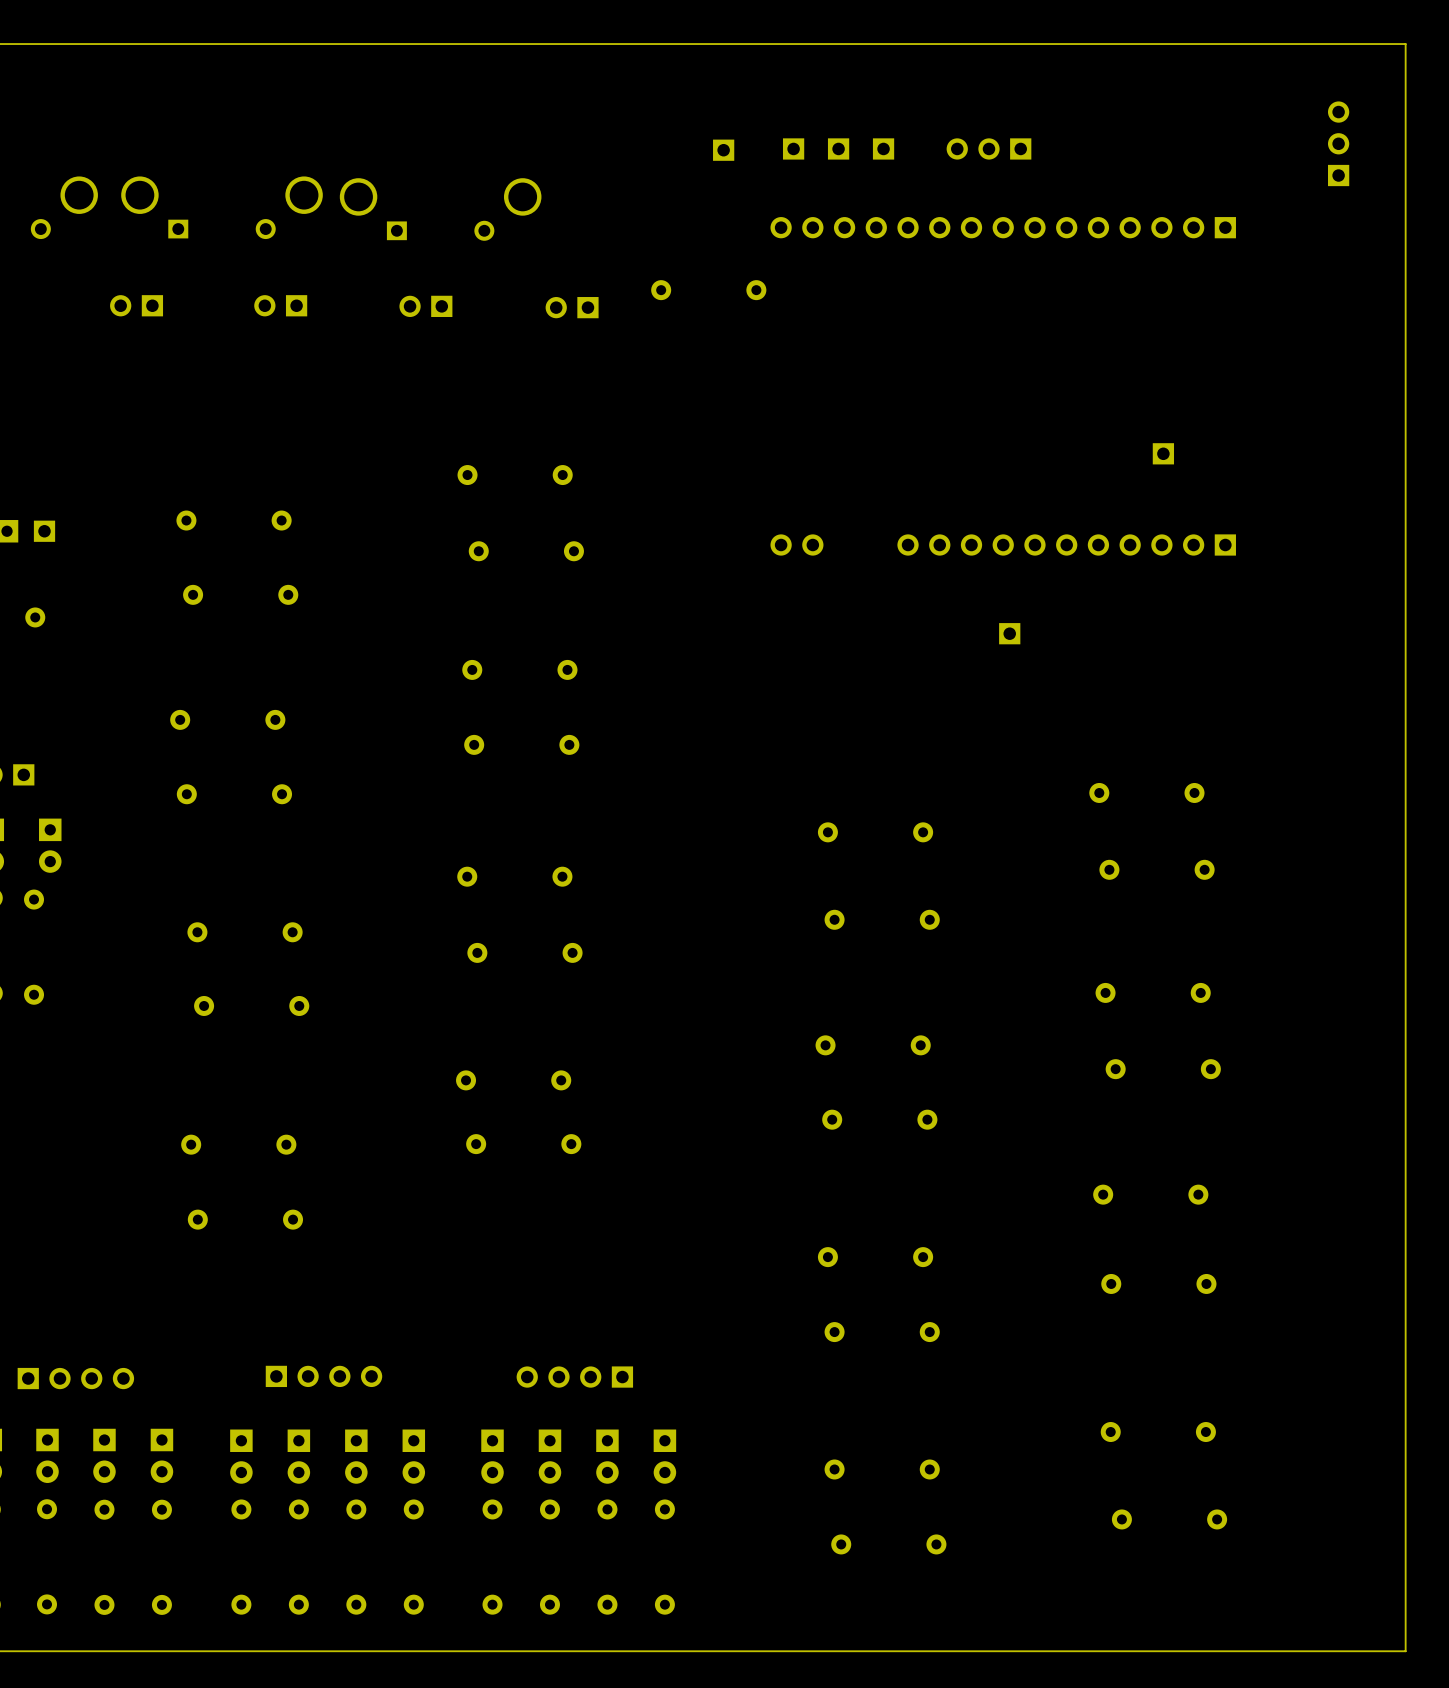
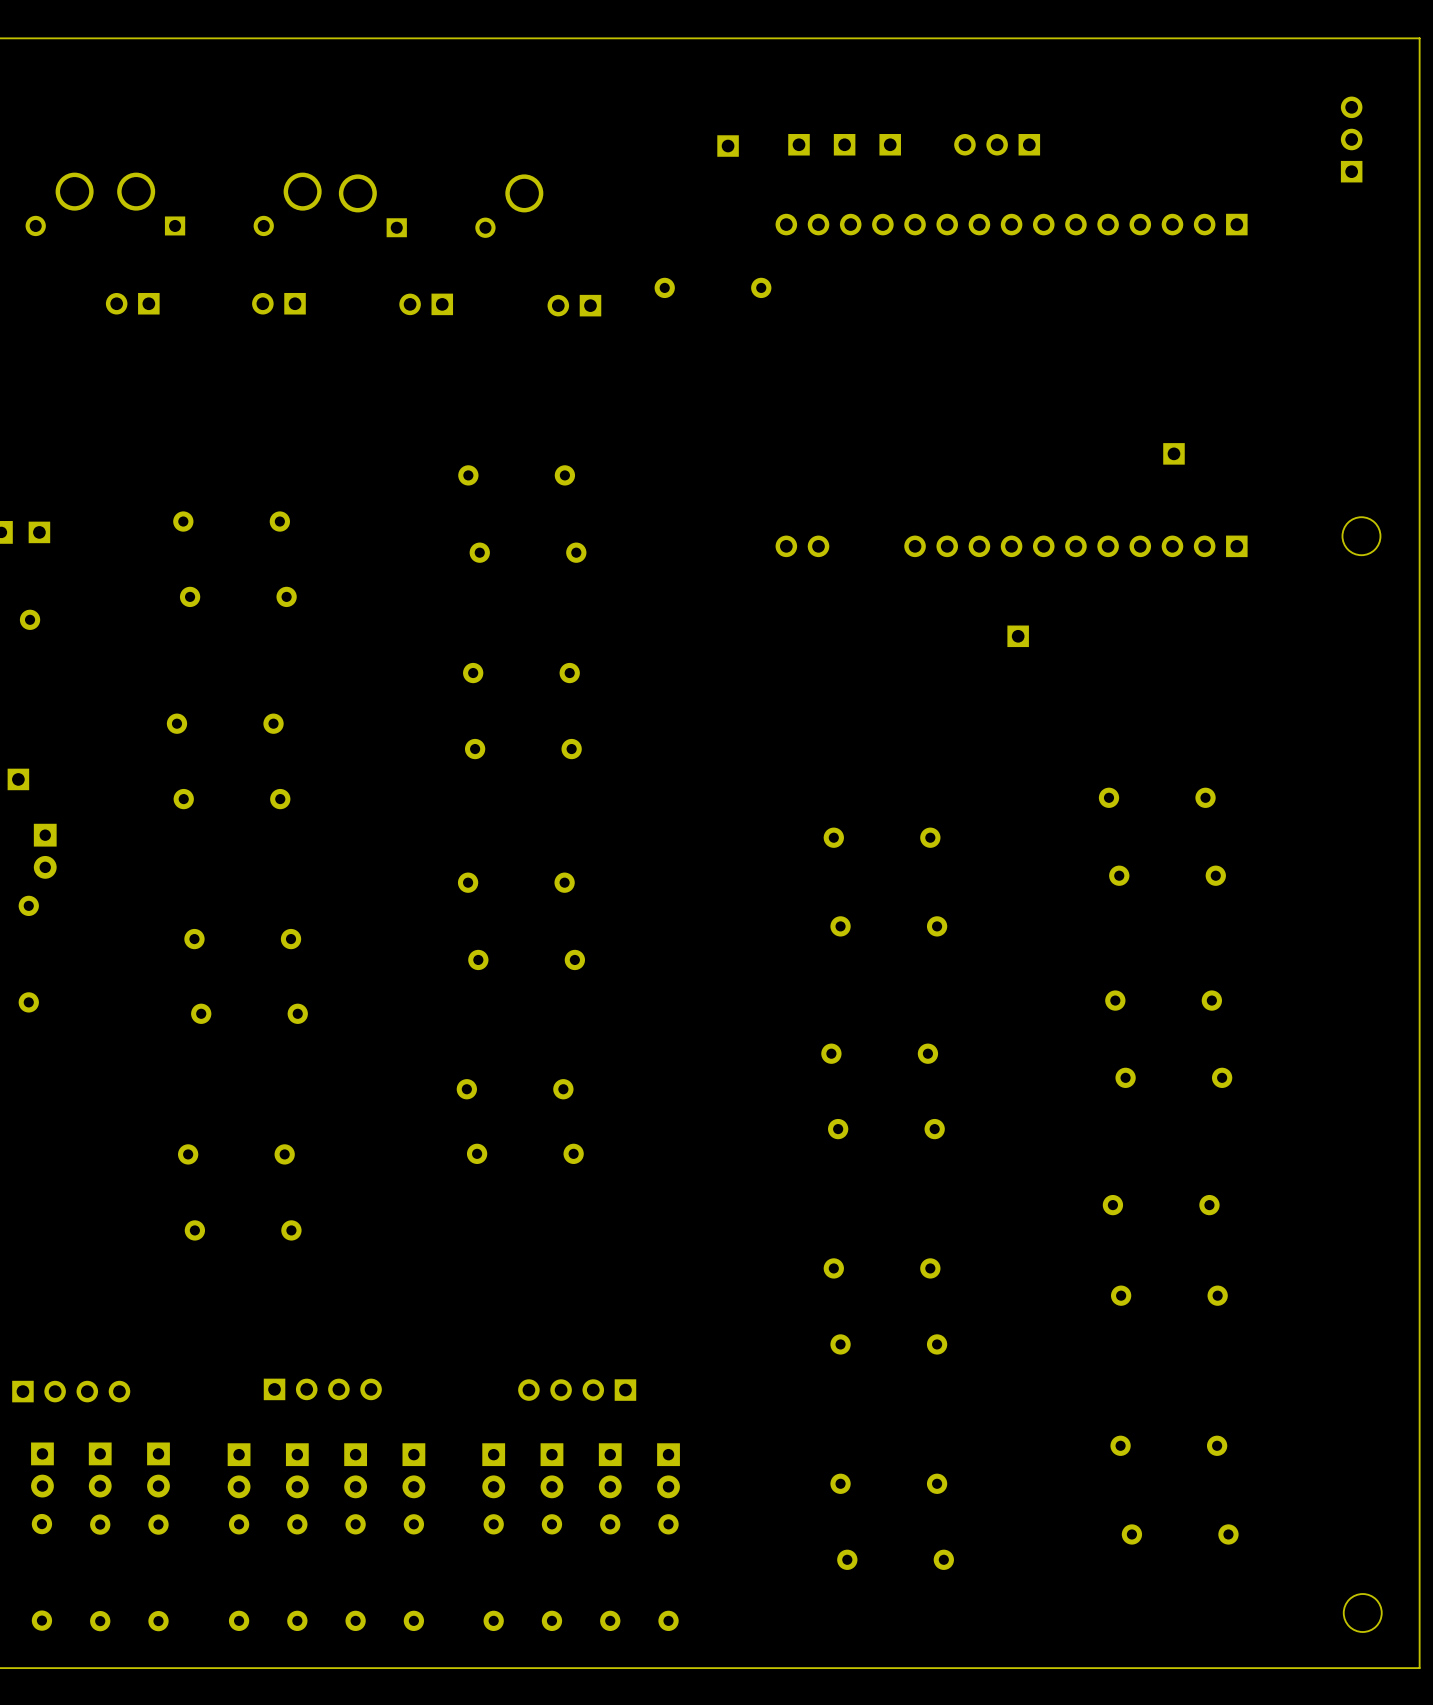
round board edge: none -> [1342, 516, 1381, 556]
round board edge: none -> [1343, 1593, 1383, 1633]

